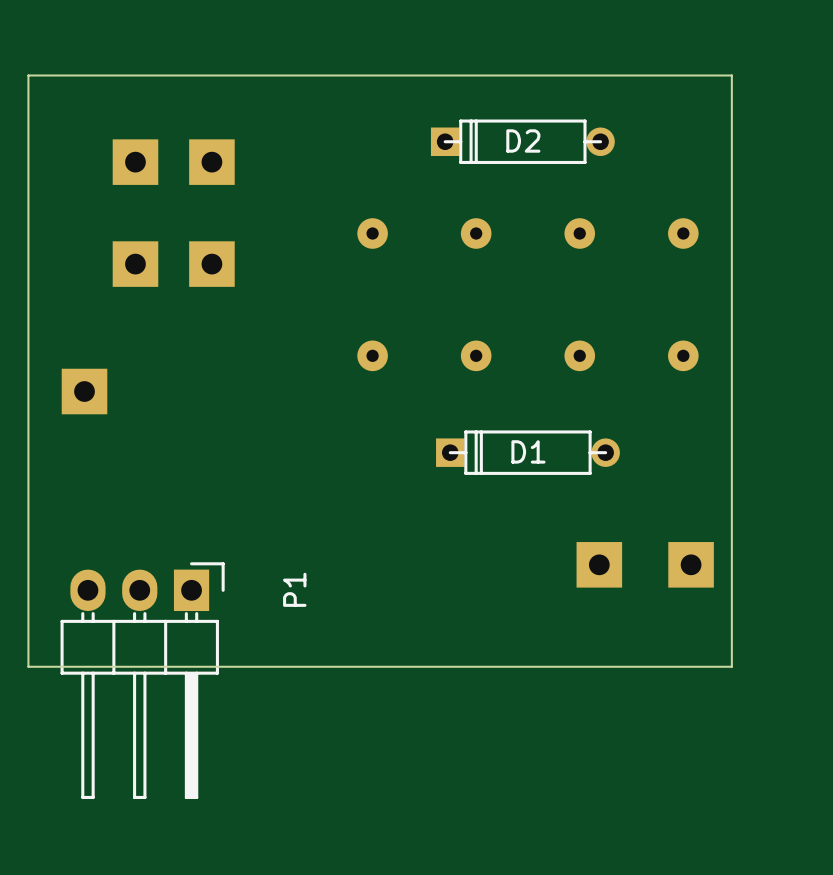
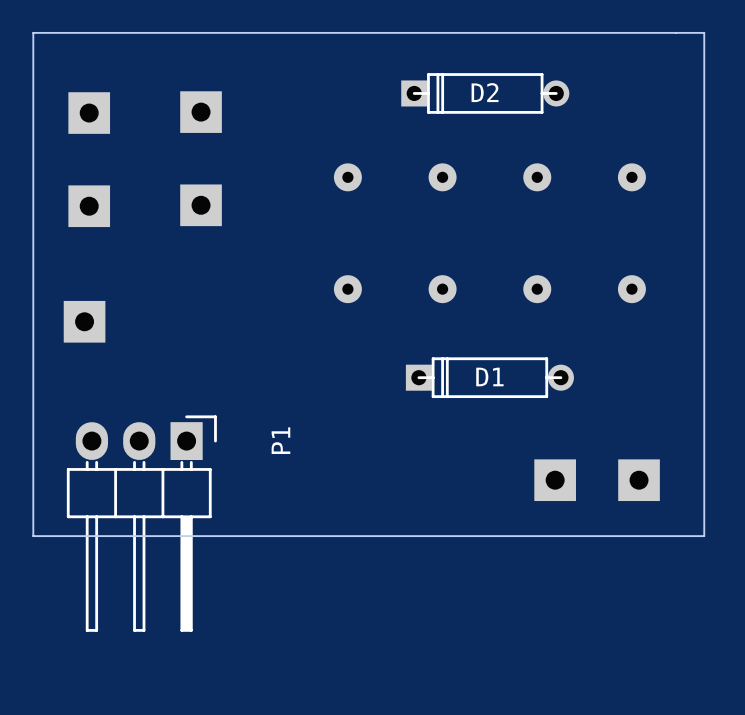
board edge: (731, 75) (731, 666) (28, 666) (28, 625) -> (676, 32) (704, 32) (704, 536) (33, 536)
part position: (135, 162) -> (89, 113)
part position: (135, 264) -> (89, 206)
P1 position: (142, 680) -> (141, 523)

